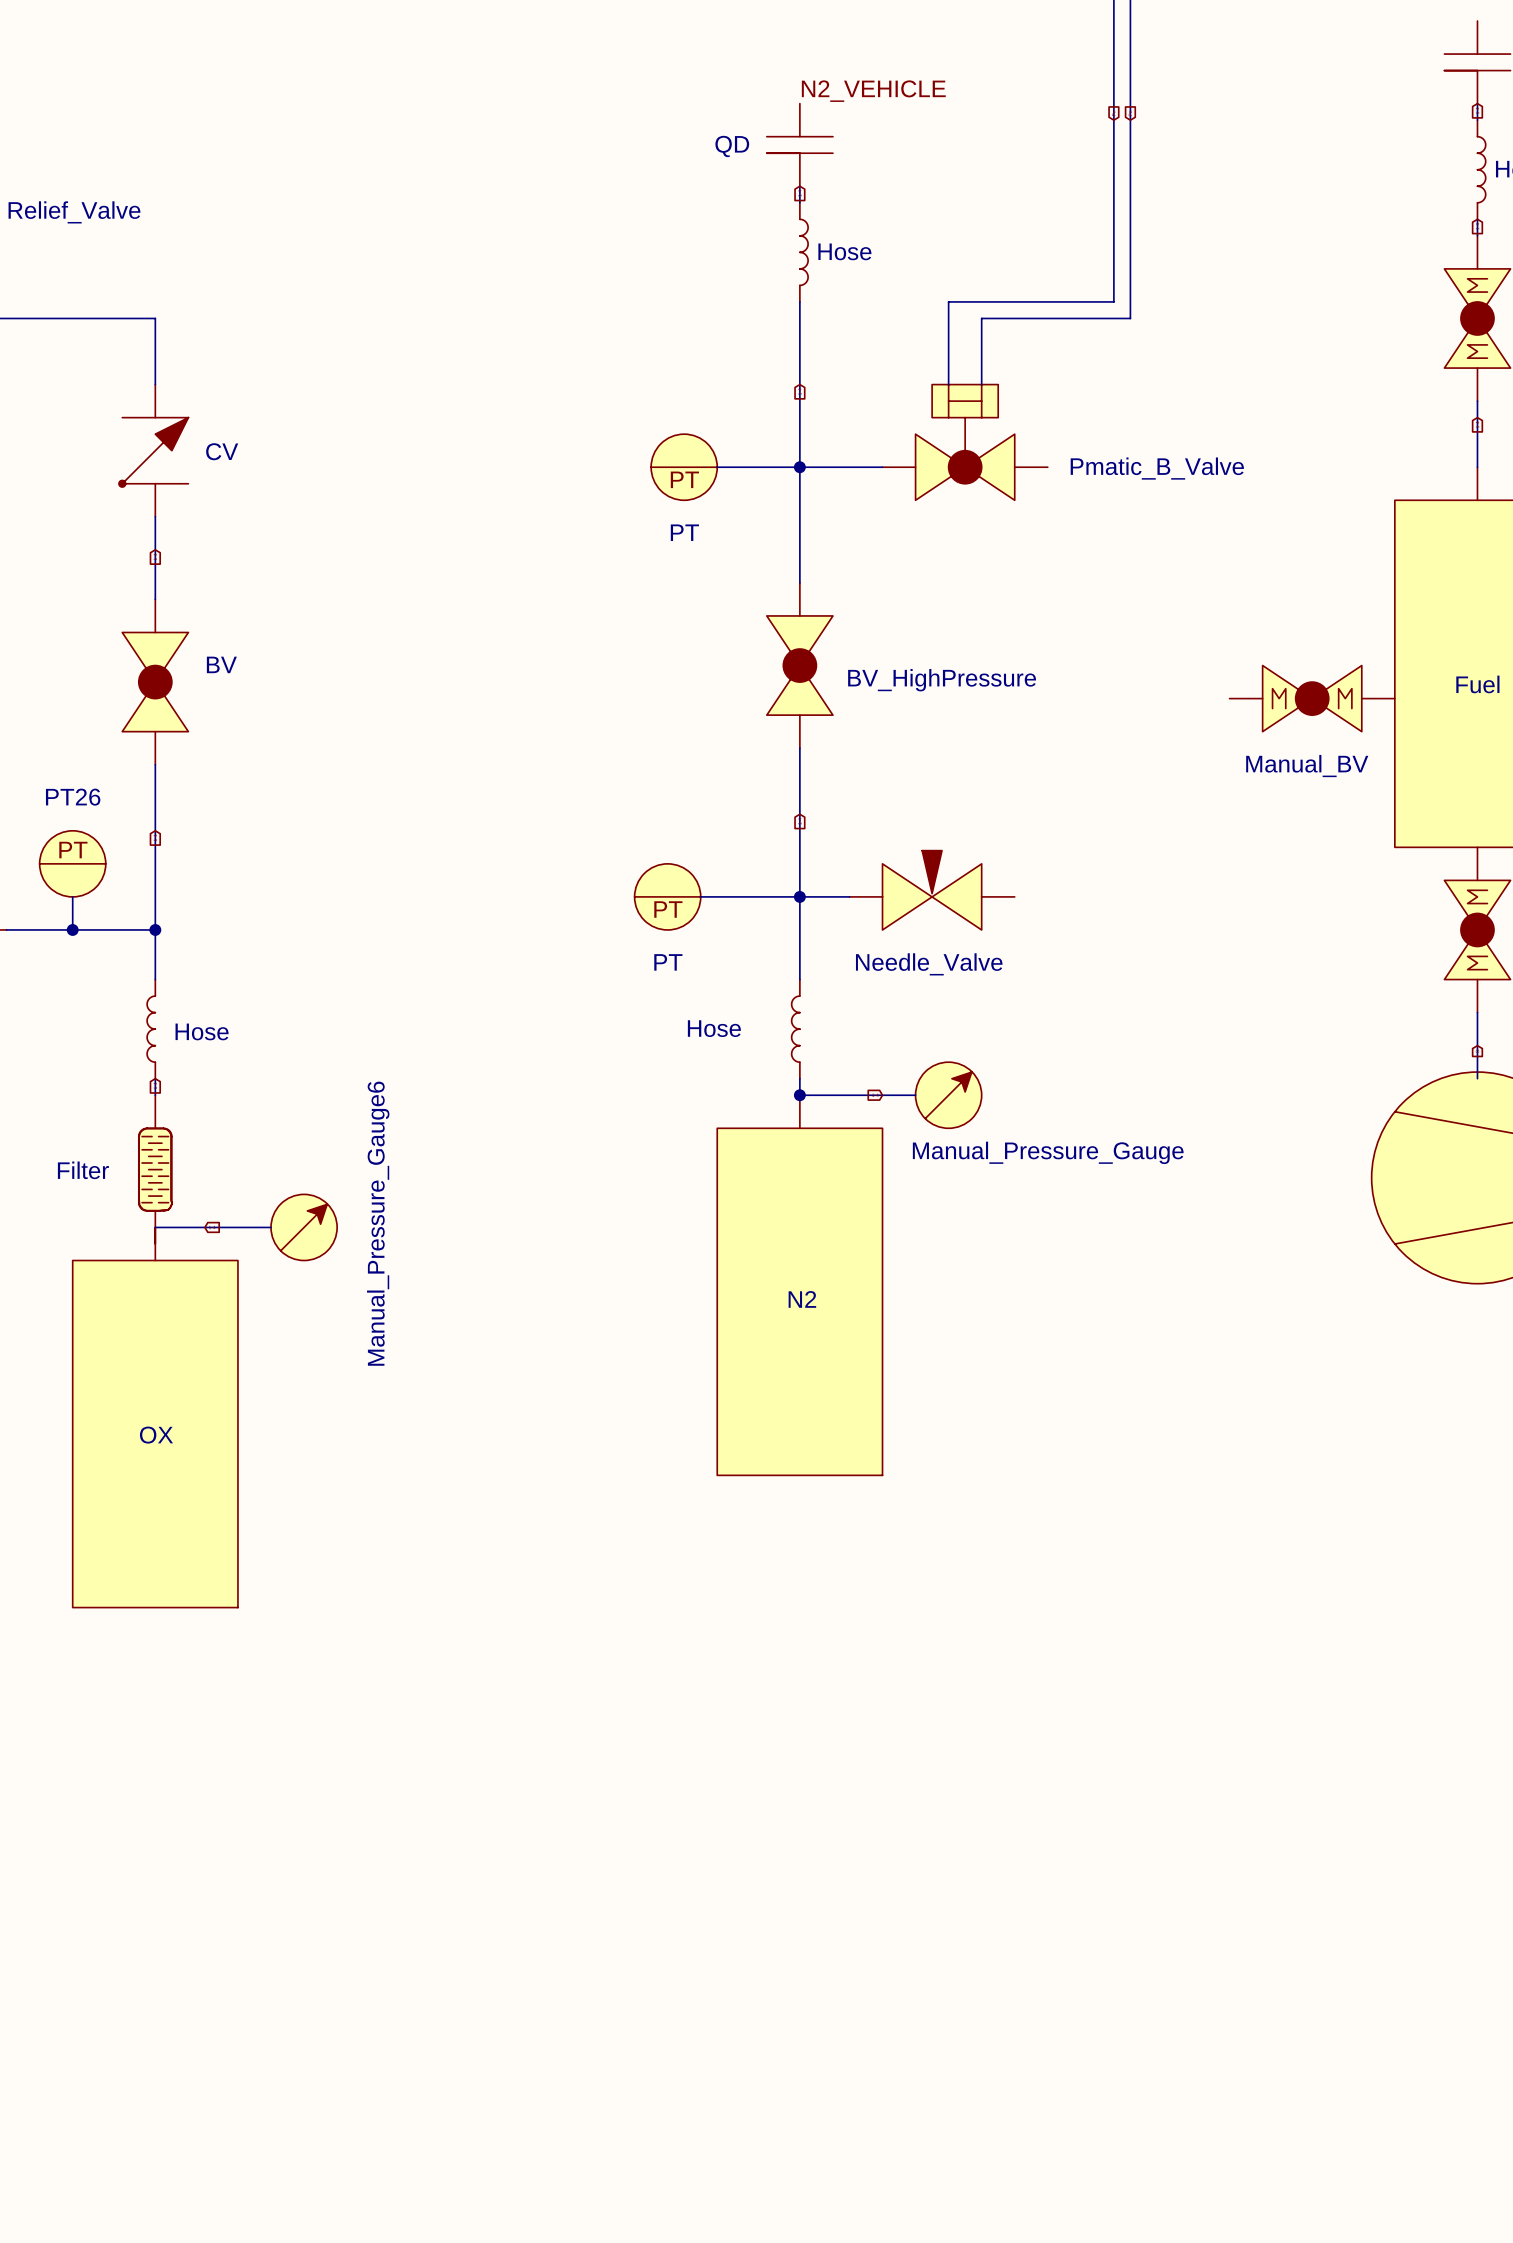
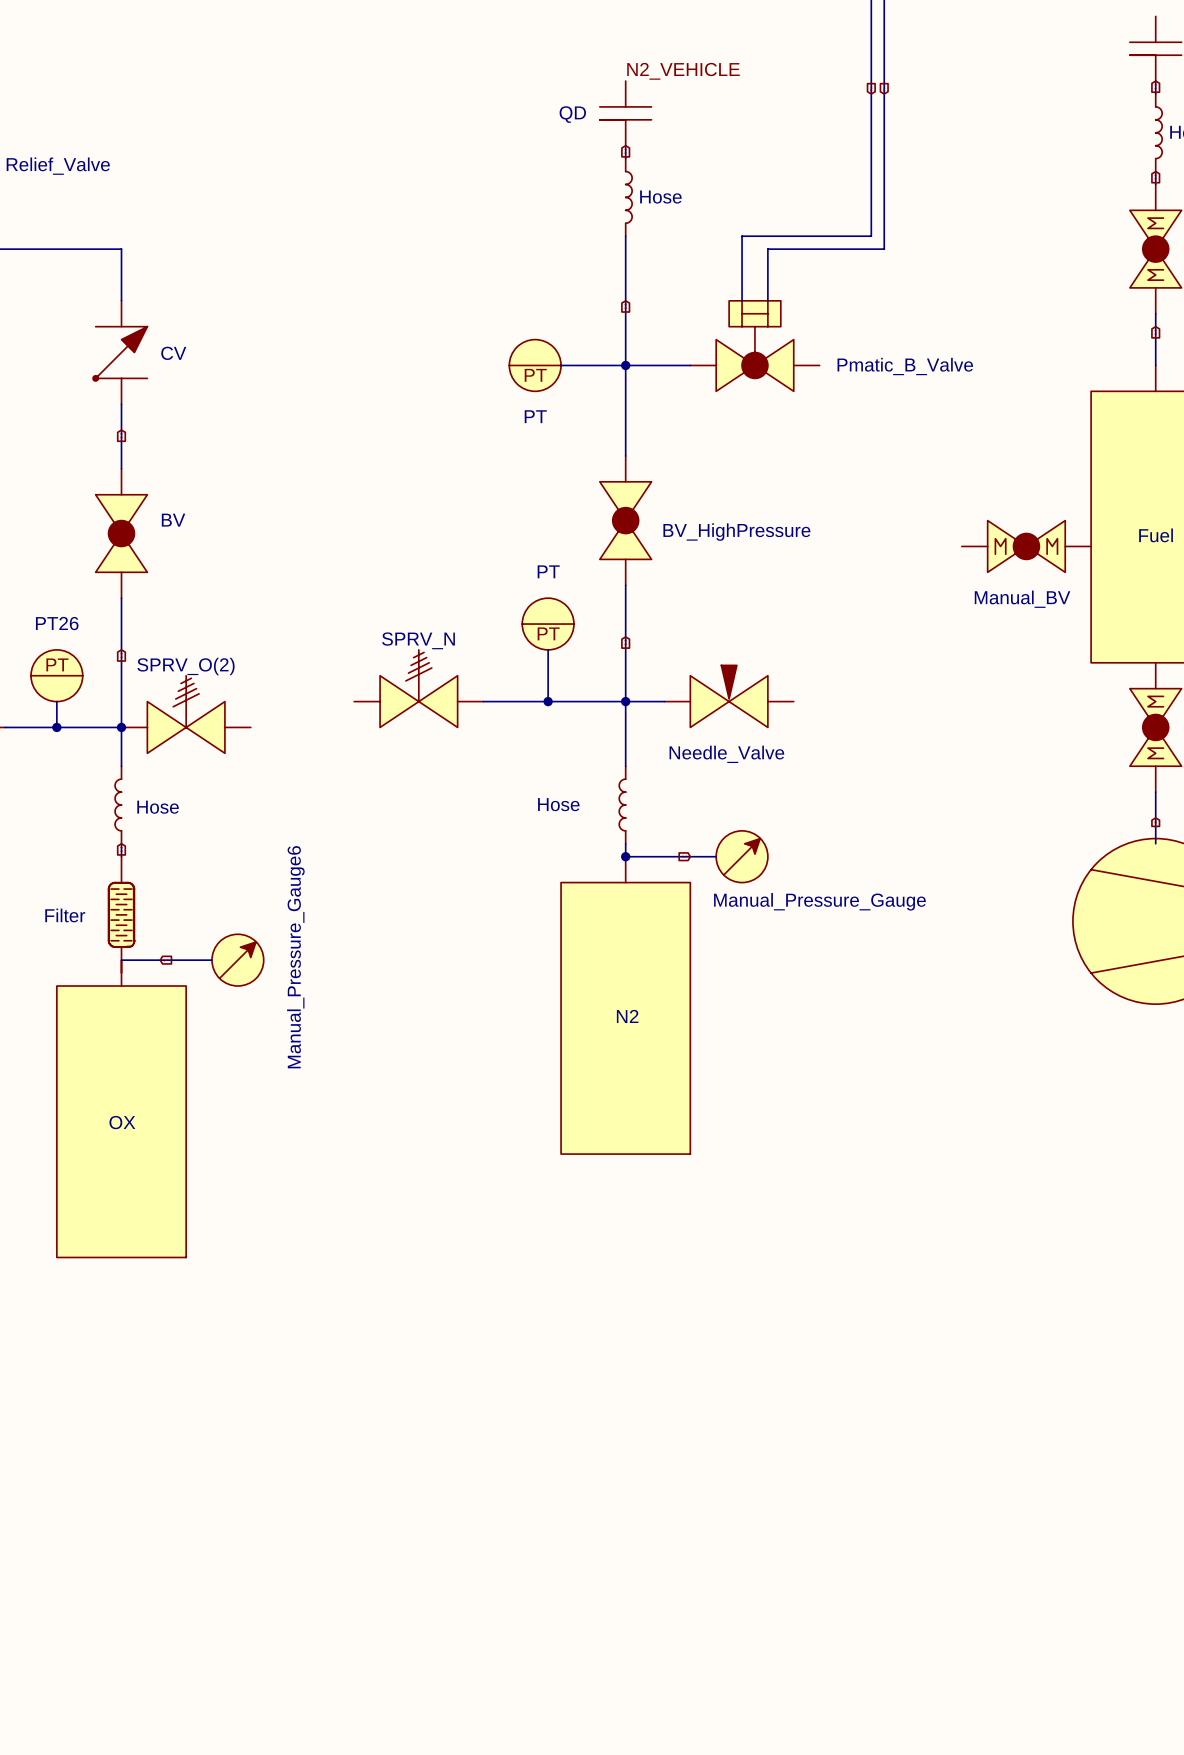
wire: none -> (548, 649) (548, 701) (483, 701)
SPRV_N: none -> (418, 688)
PT position: (667, 896) -> (548, 624)
junction: none -> (548, 701)
SPRV_O(2): none -> (186, 714)
PT name position: PT (668, 962) -> PT (548, 571)

